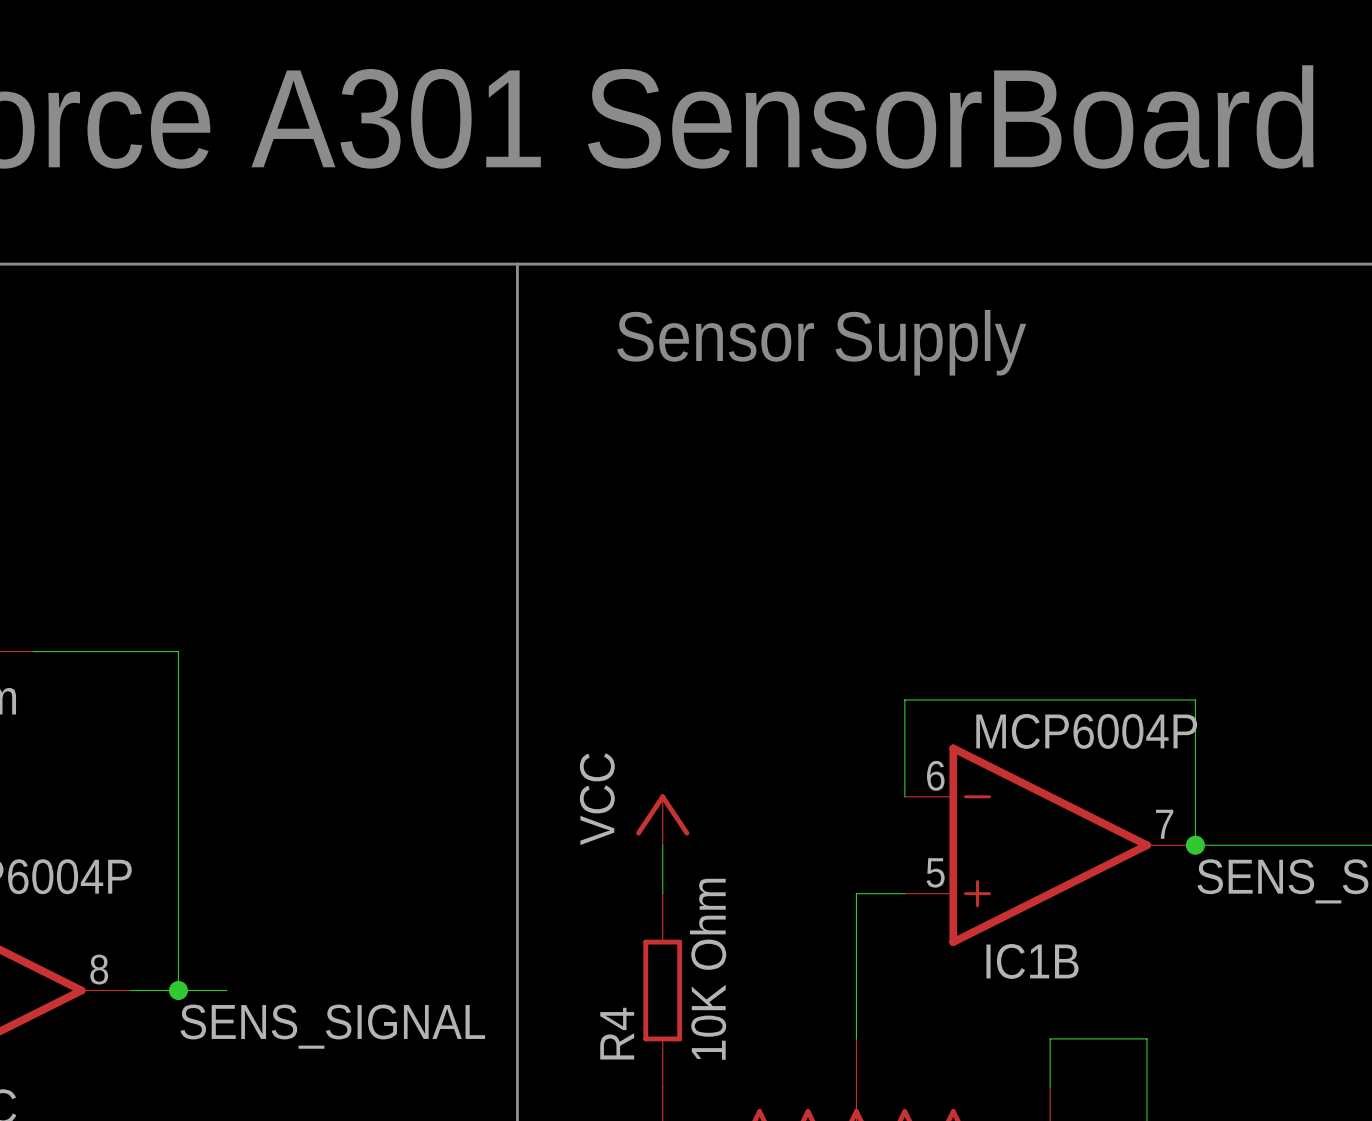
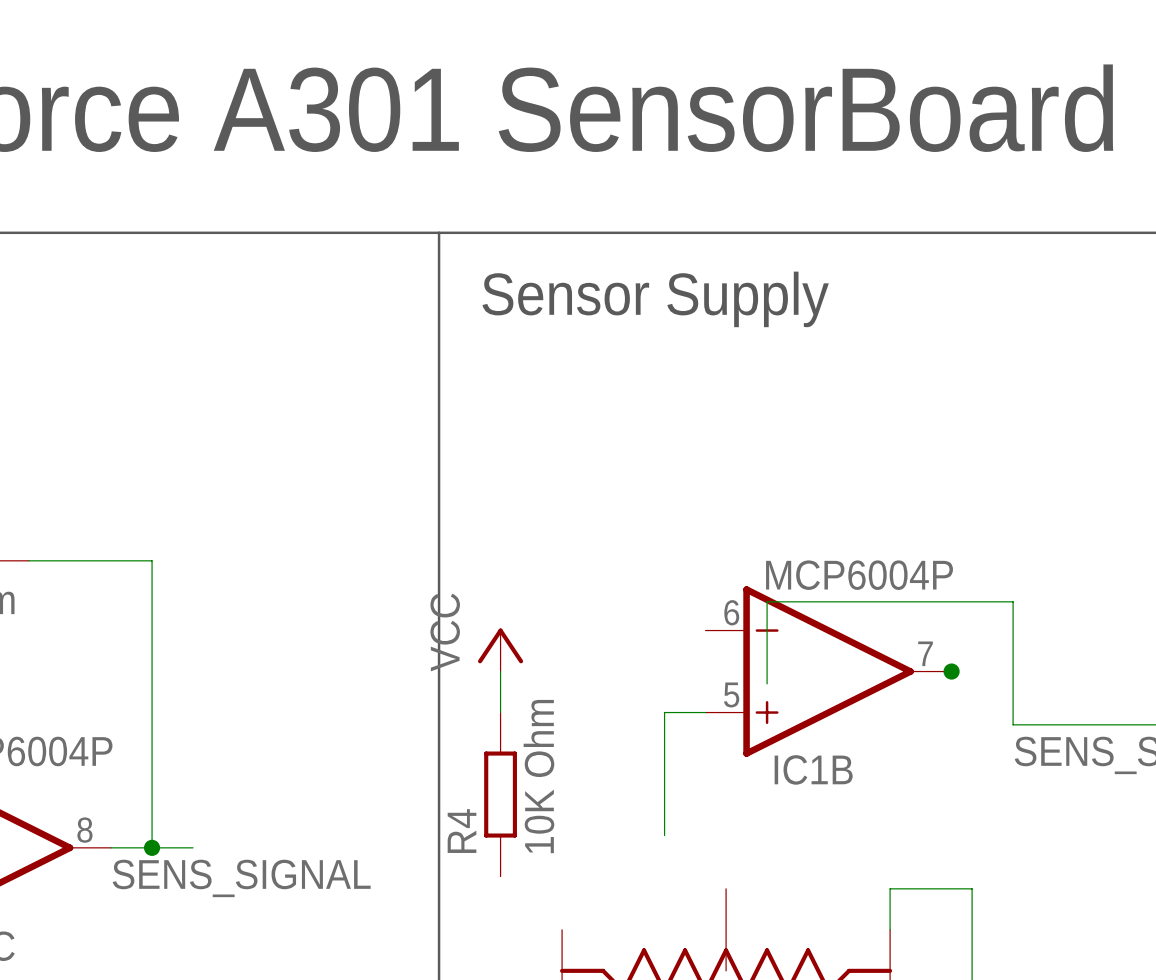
text position: Sensor Supply (821, 342) -> Sensor Supply (655, 299)
power symbol position: VCC (662, 819) -> VCC (500, 650)
wire: (662, 845) (662, 893) -> (500, 671) (500, 712)
IC1B position: (1050, 845) -> (828, 671)
junction position: (1195, 845) -> (951, 671)
wire: (904, 893) (856, 893) (856, 1038) -> (705, 712) (664, 712) (664, 835)
R4 position: (662, 990) -> (500, 794)
label position: SENS_SIGNAL (332, 1026) -> SENS_SIGNAL (241, 878)

